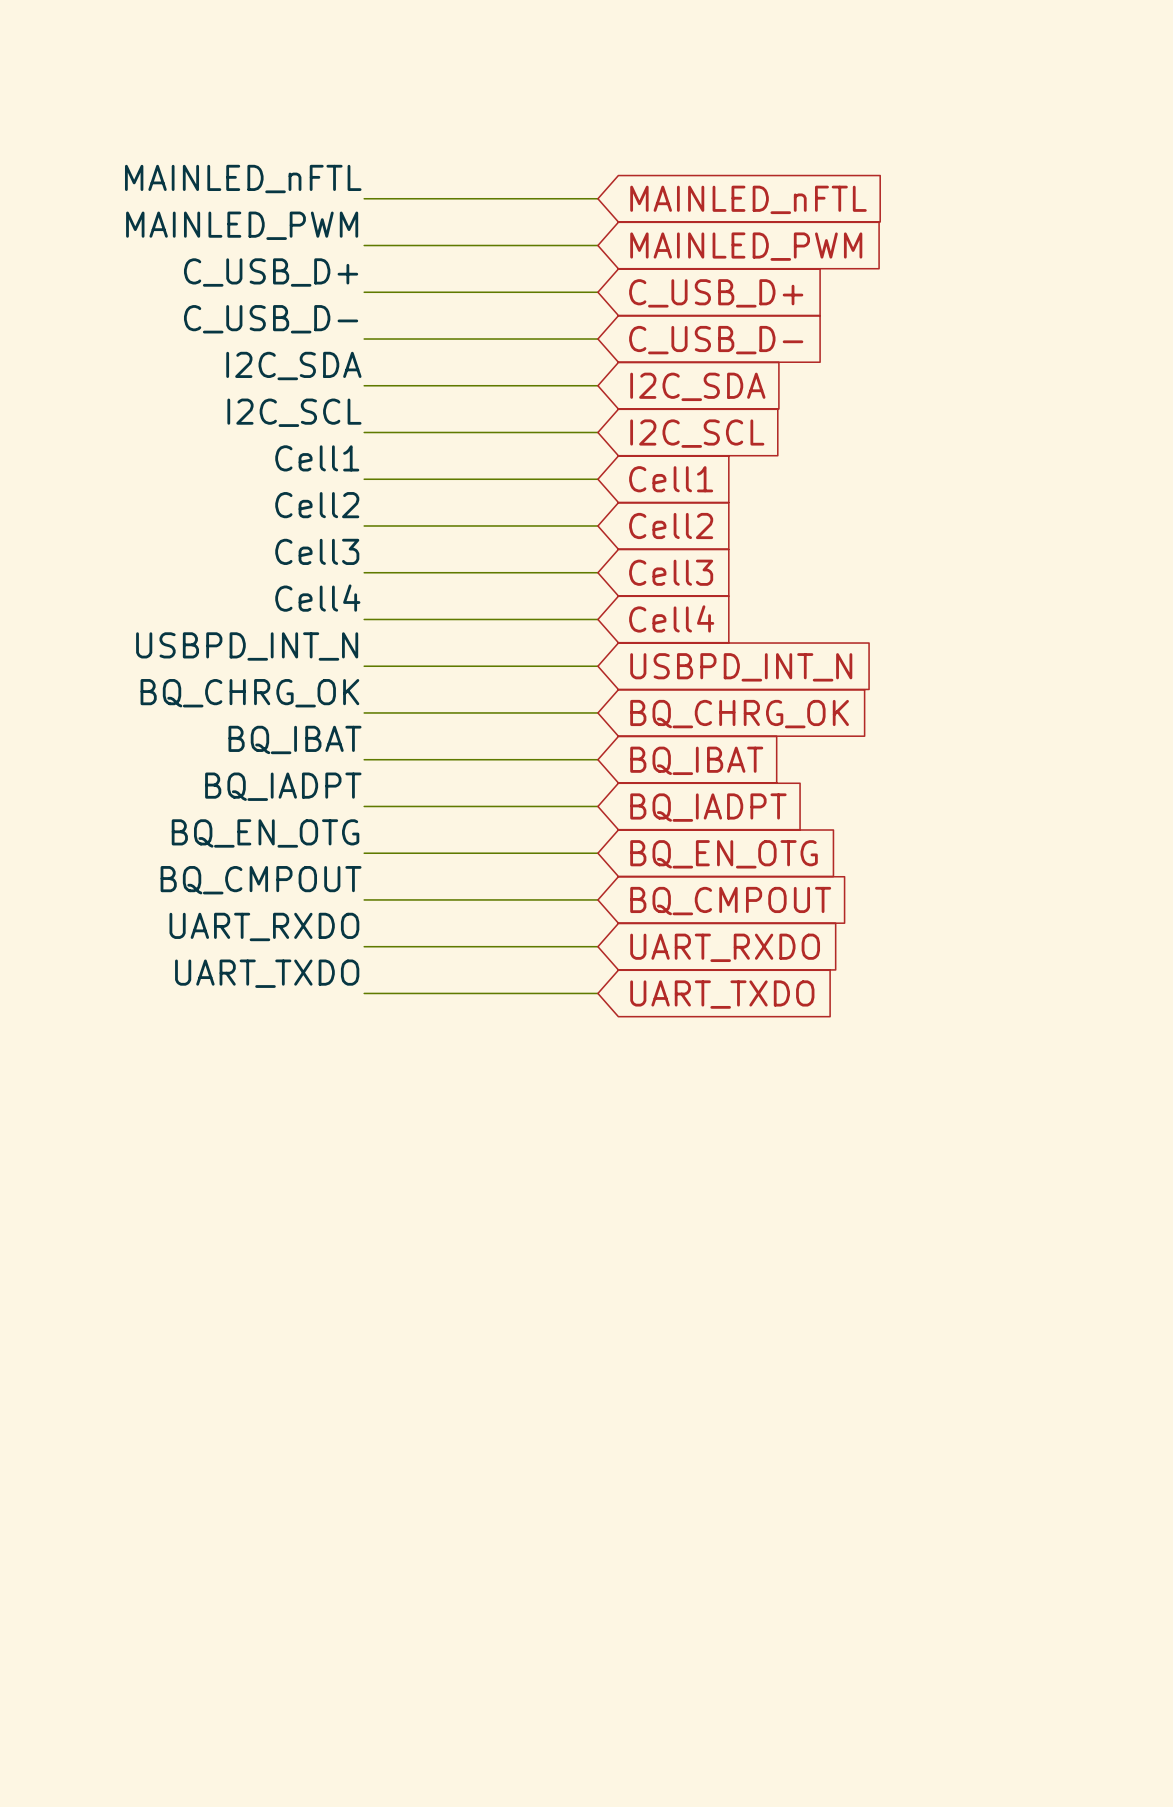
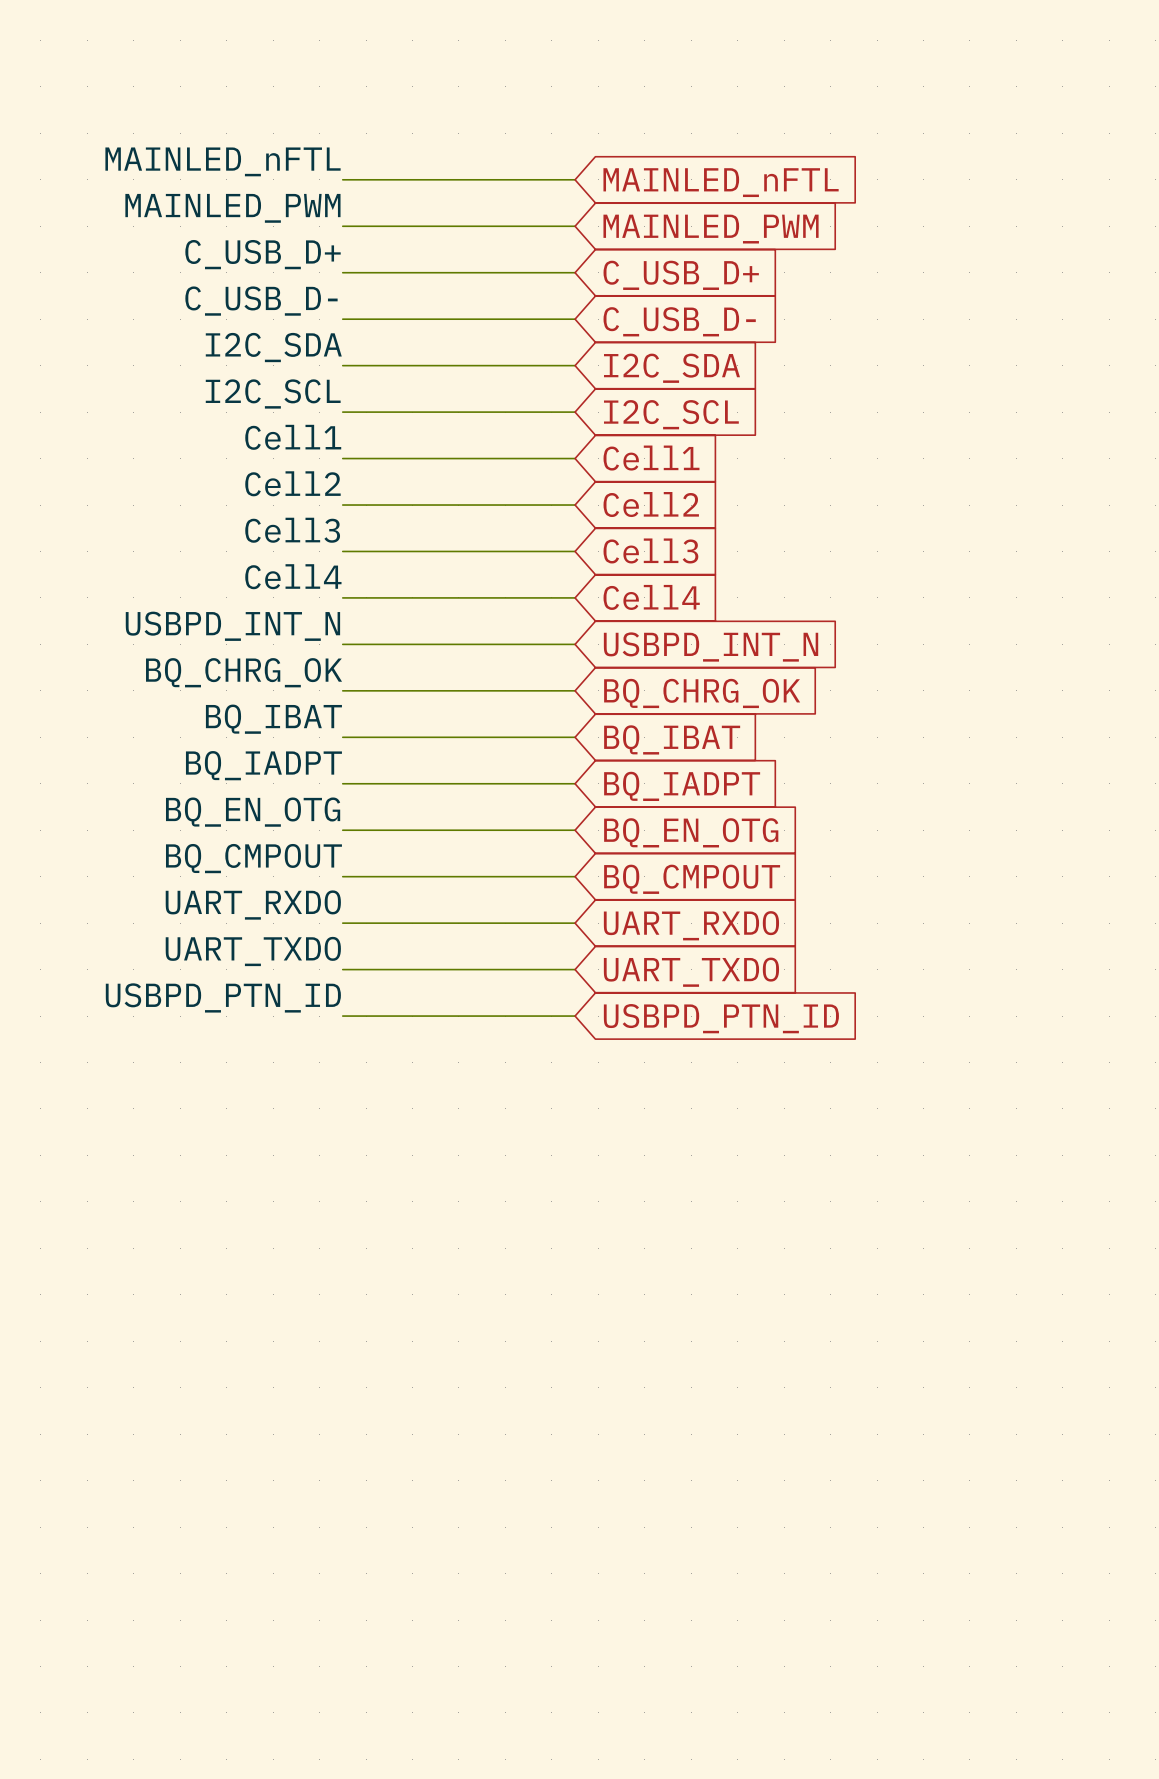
label: none -> USBPD_PTN_ID (223, 997)
wire: none -> (342, 1016) (575, 1016)
global label: none -> USBPD_PTN_ID (721, 1018)

